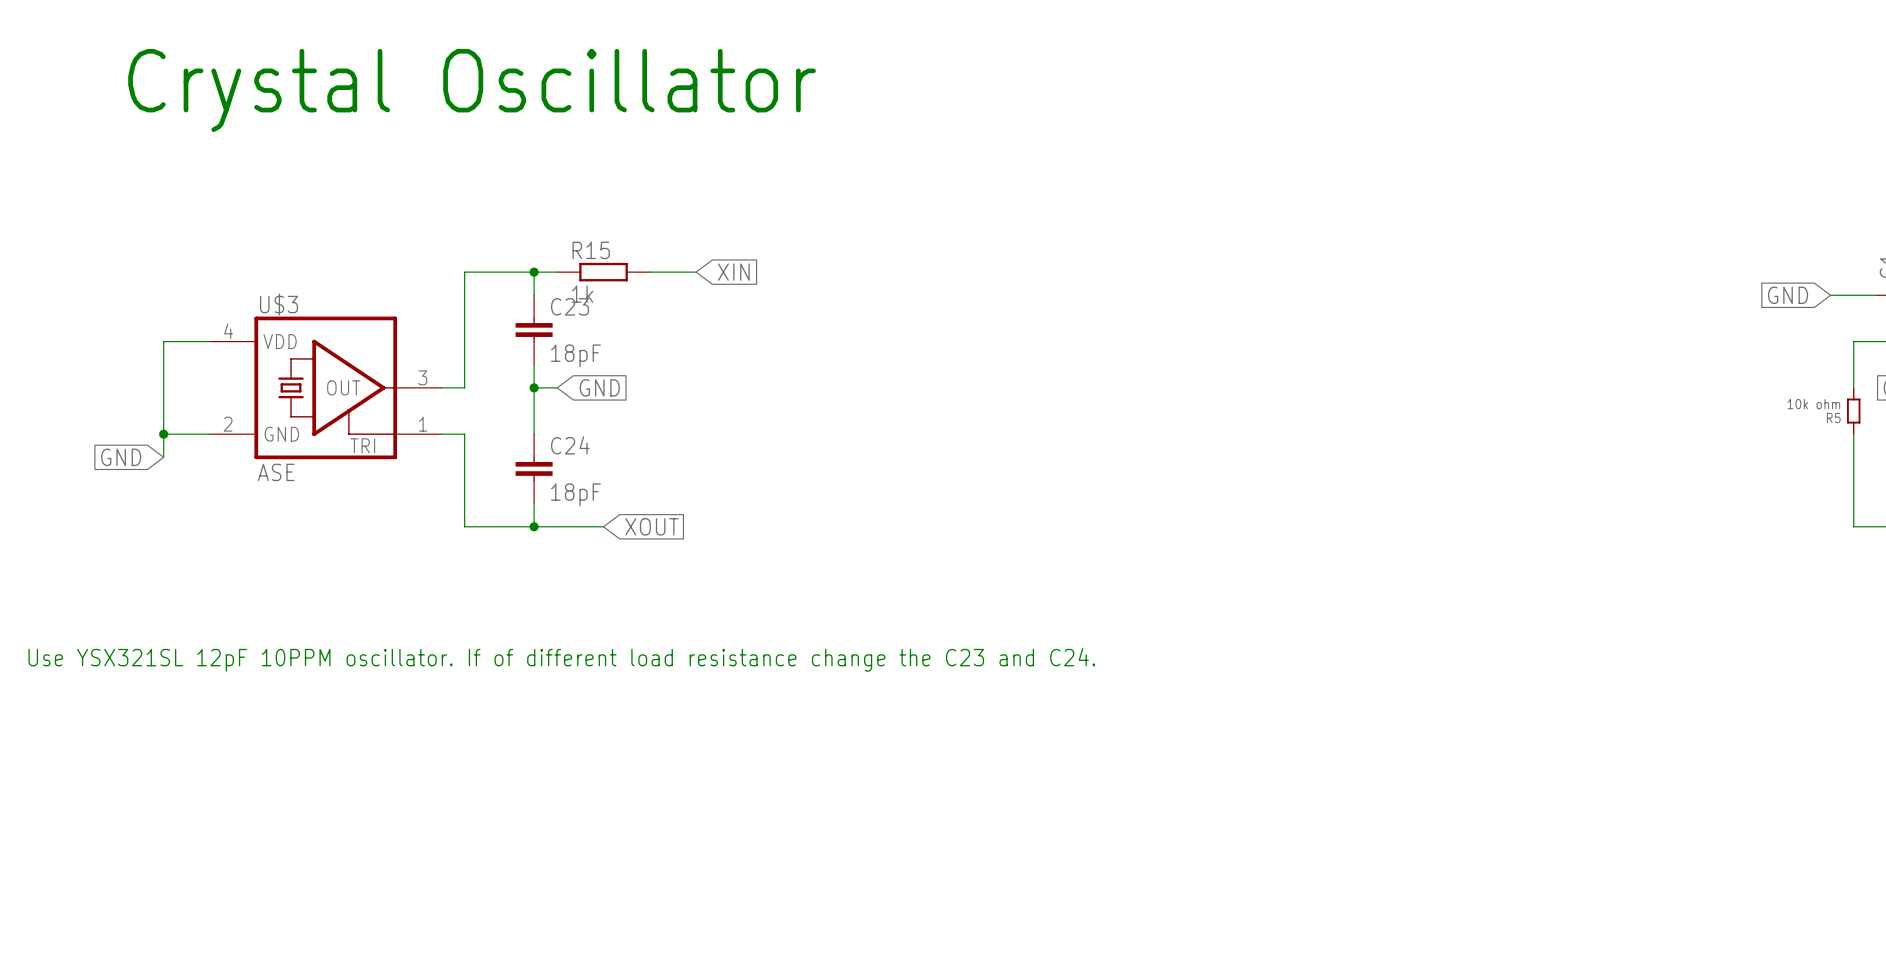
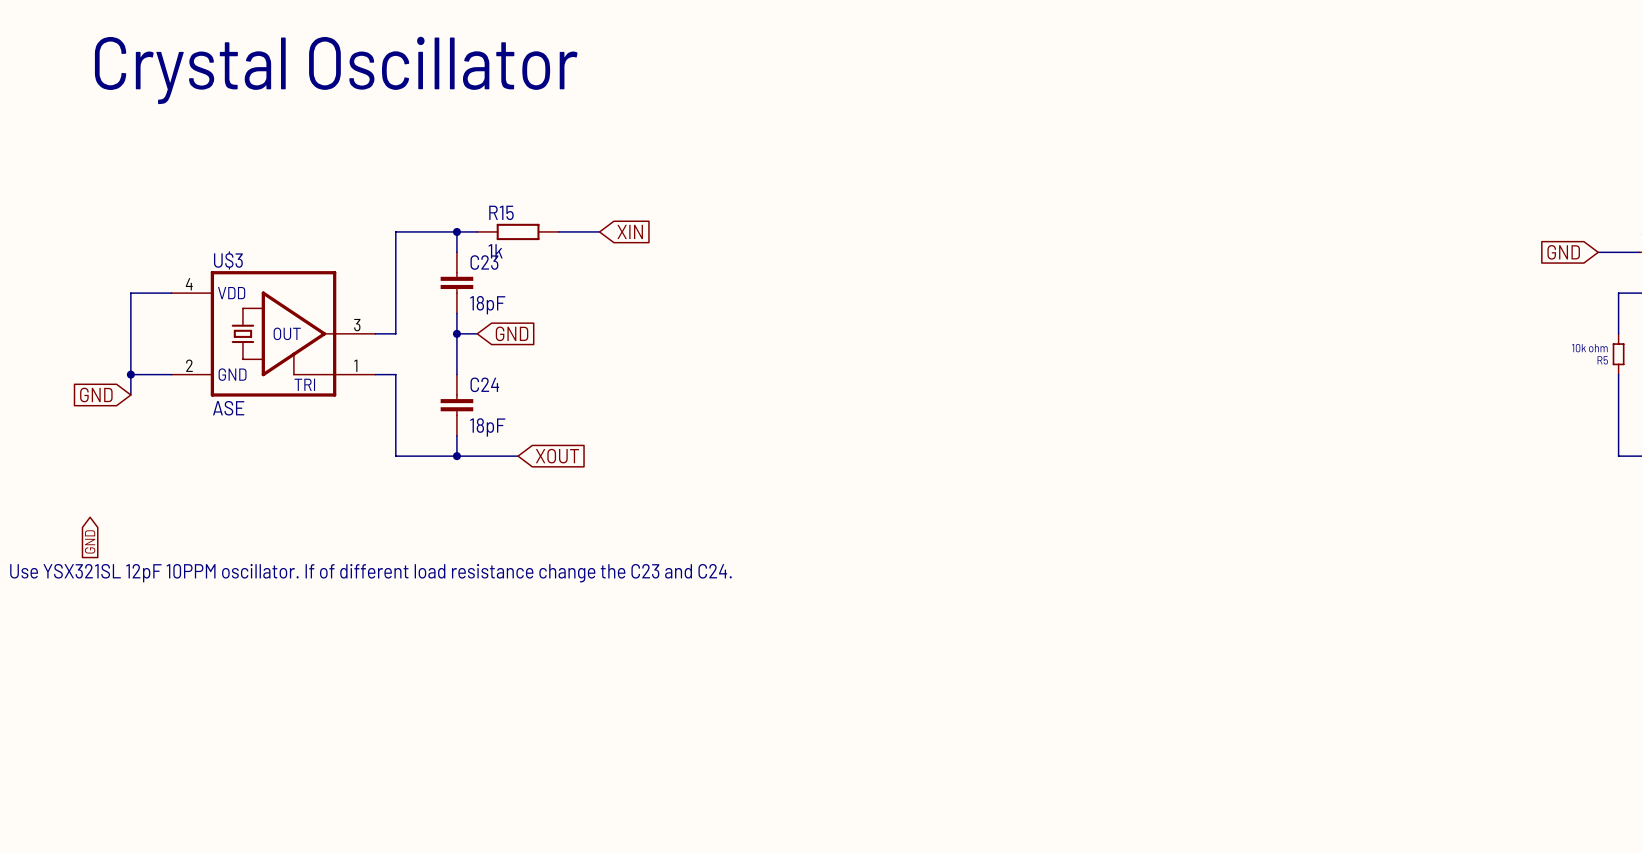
global label: none -> GND (90, 541)

